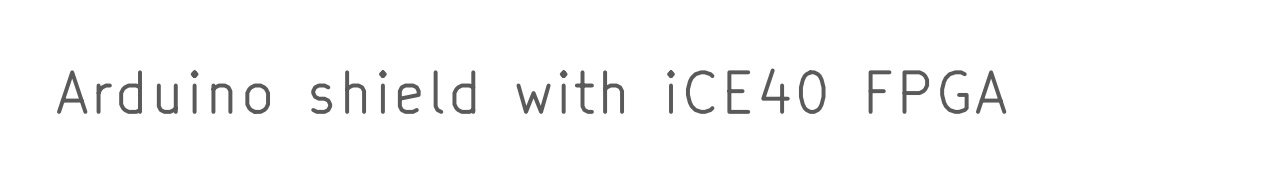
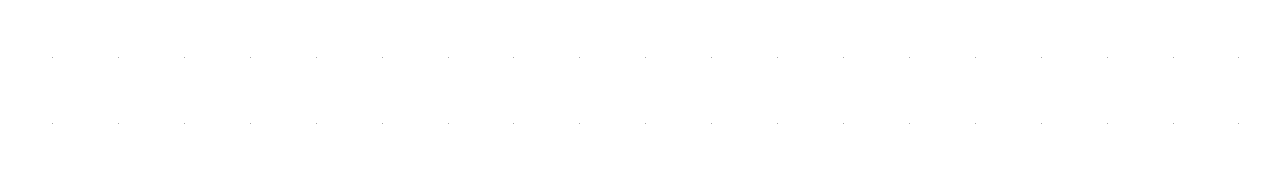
text: Arduino shield with iCE40 FPGA (531, 91) -> none

